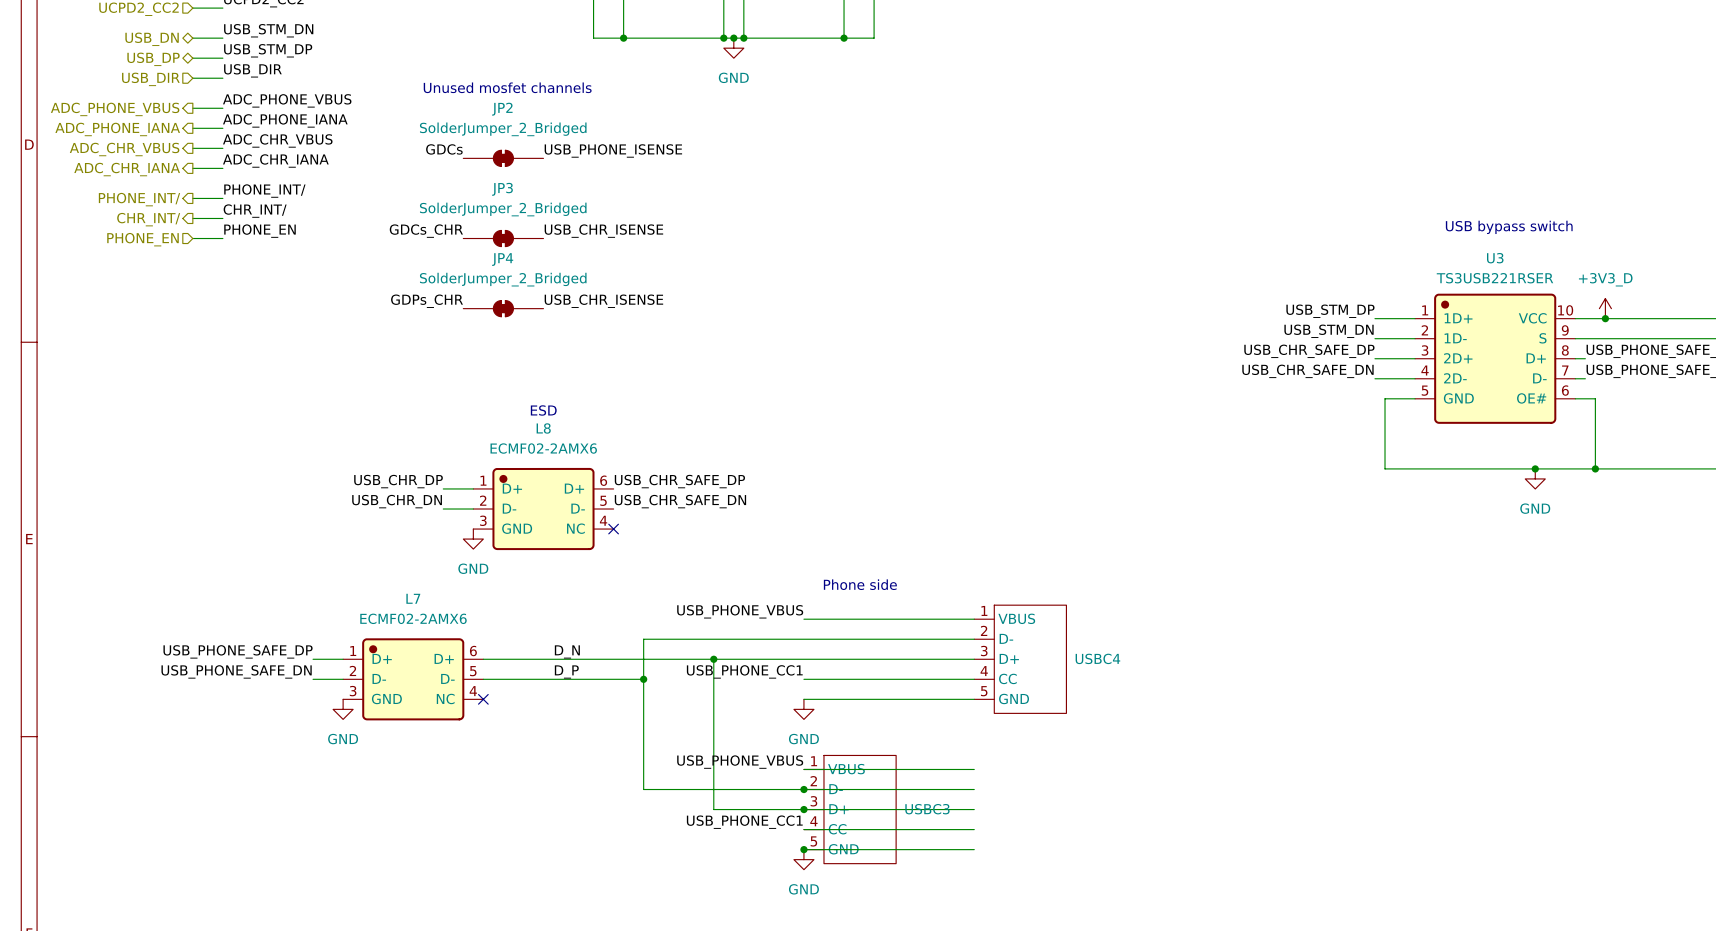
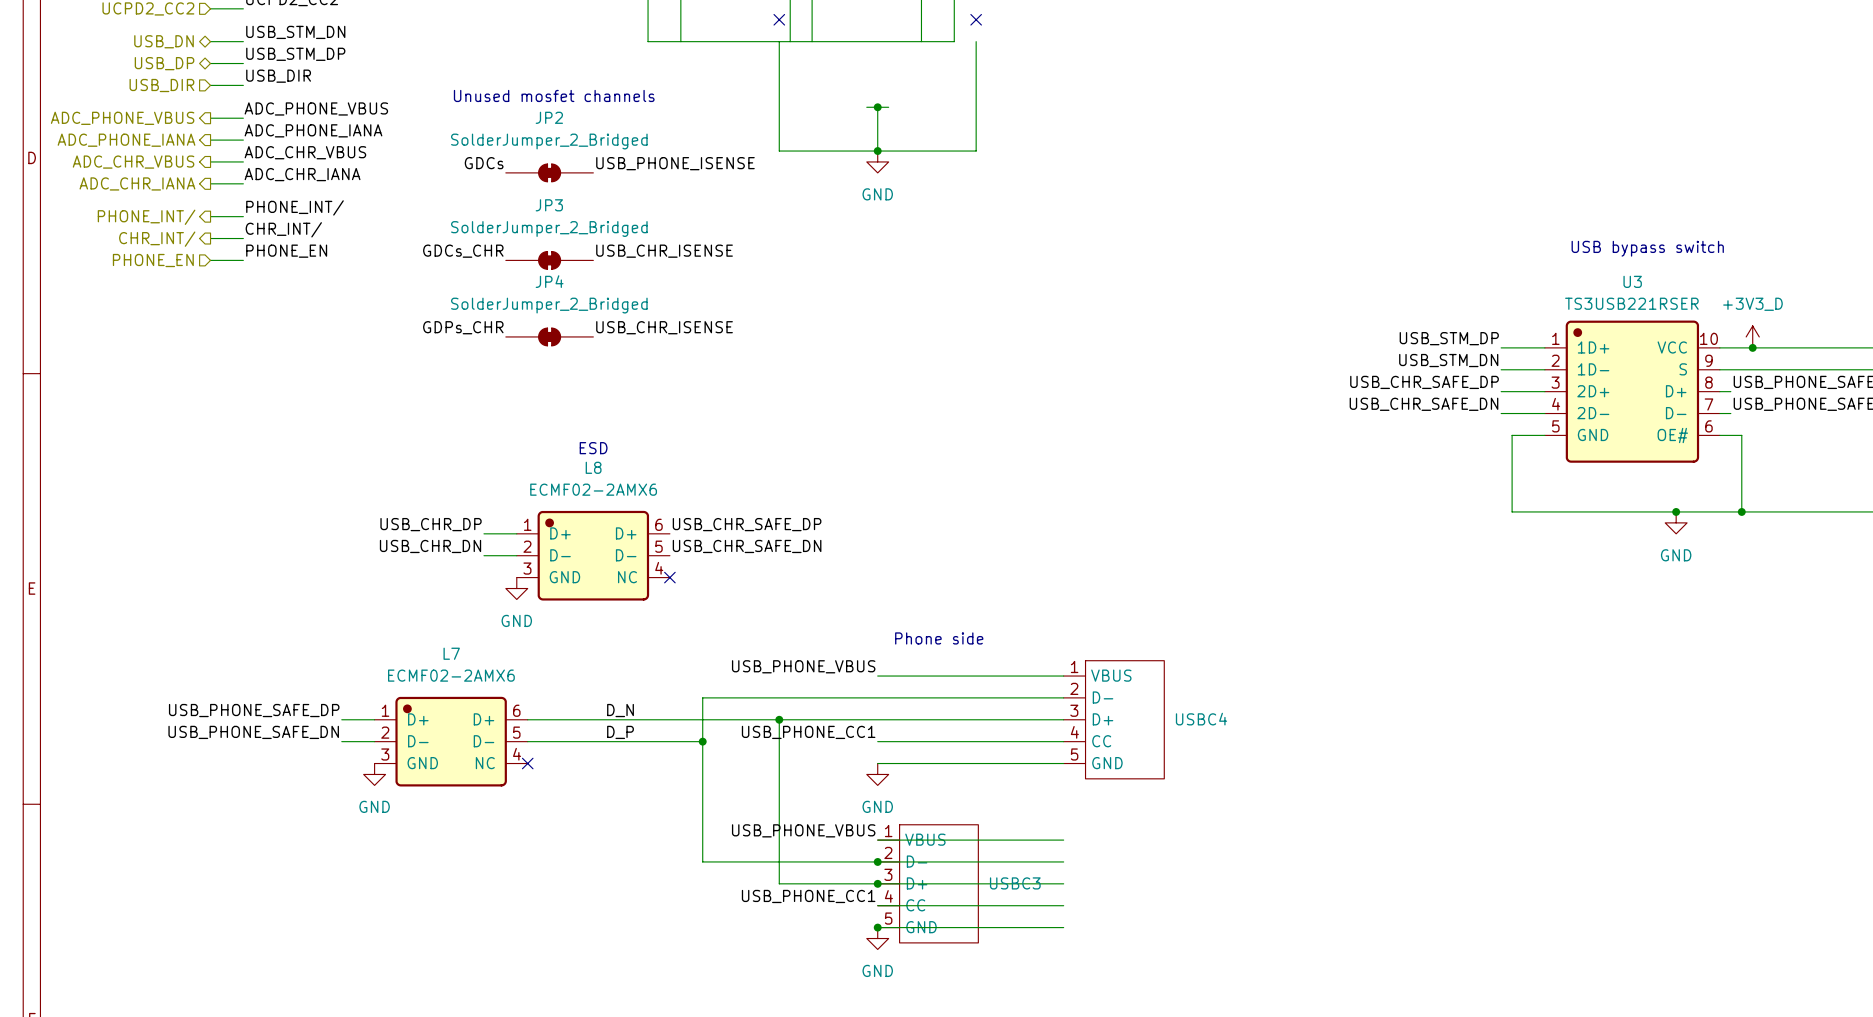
no-connect mark: none -> (779, 19)
no-connect mark: none -> (976, 19)
junction: (623, 38) -> none
wire: none -> (779, 41) (779, 151) (976, 151) (976, 41)
junction: (723, 38) -> none
junction: (733, 38) -> none
junction: (743, 38) -> none
junction: (844, 38) -> none
power symbol position: GND (733, 48) -> GND (877, 161)
wire: none -> (866, 107) (888, 107)
wire: none -> (877, 107) (877, 151)
junction: none -> (877, 107)
junction: none -> (877, 151)

